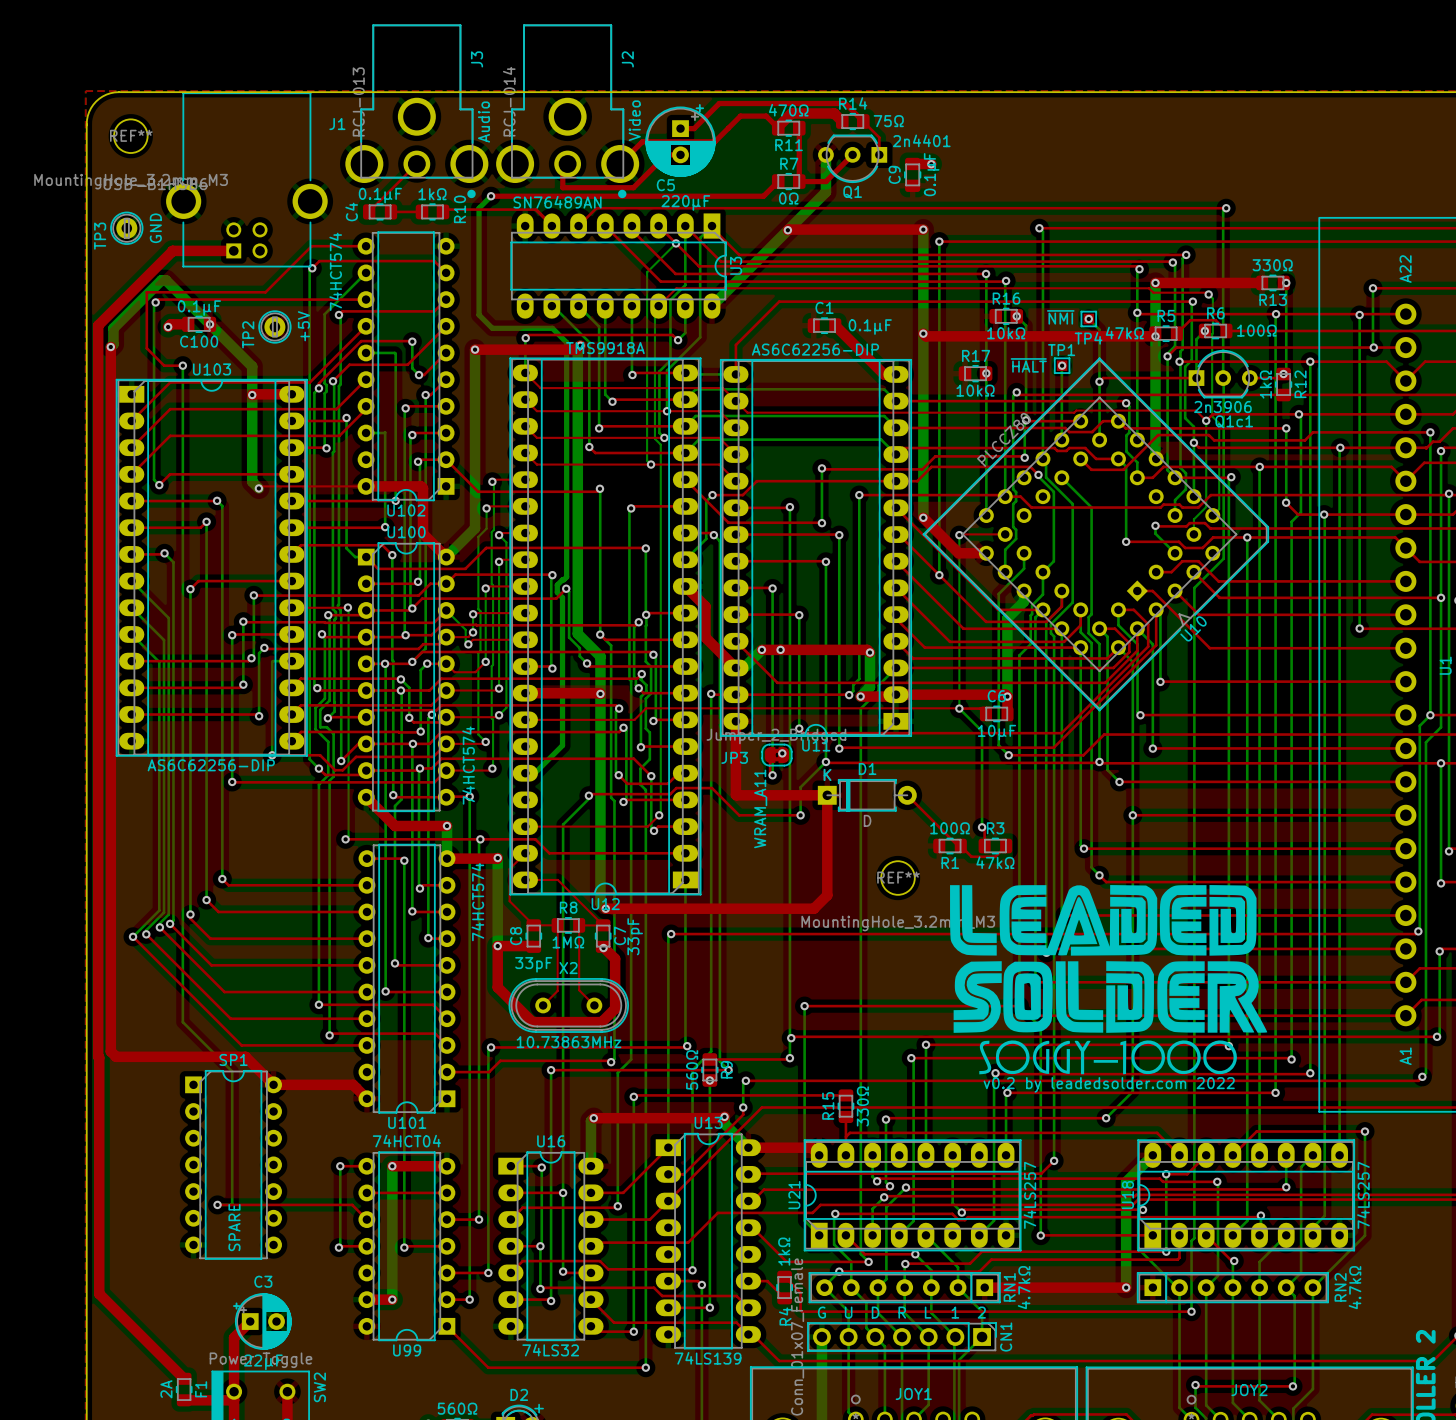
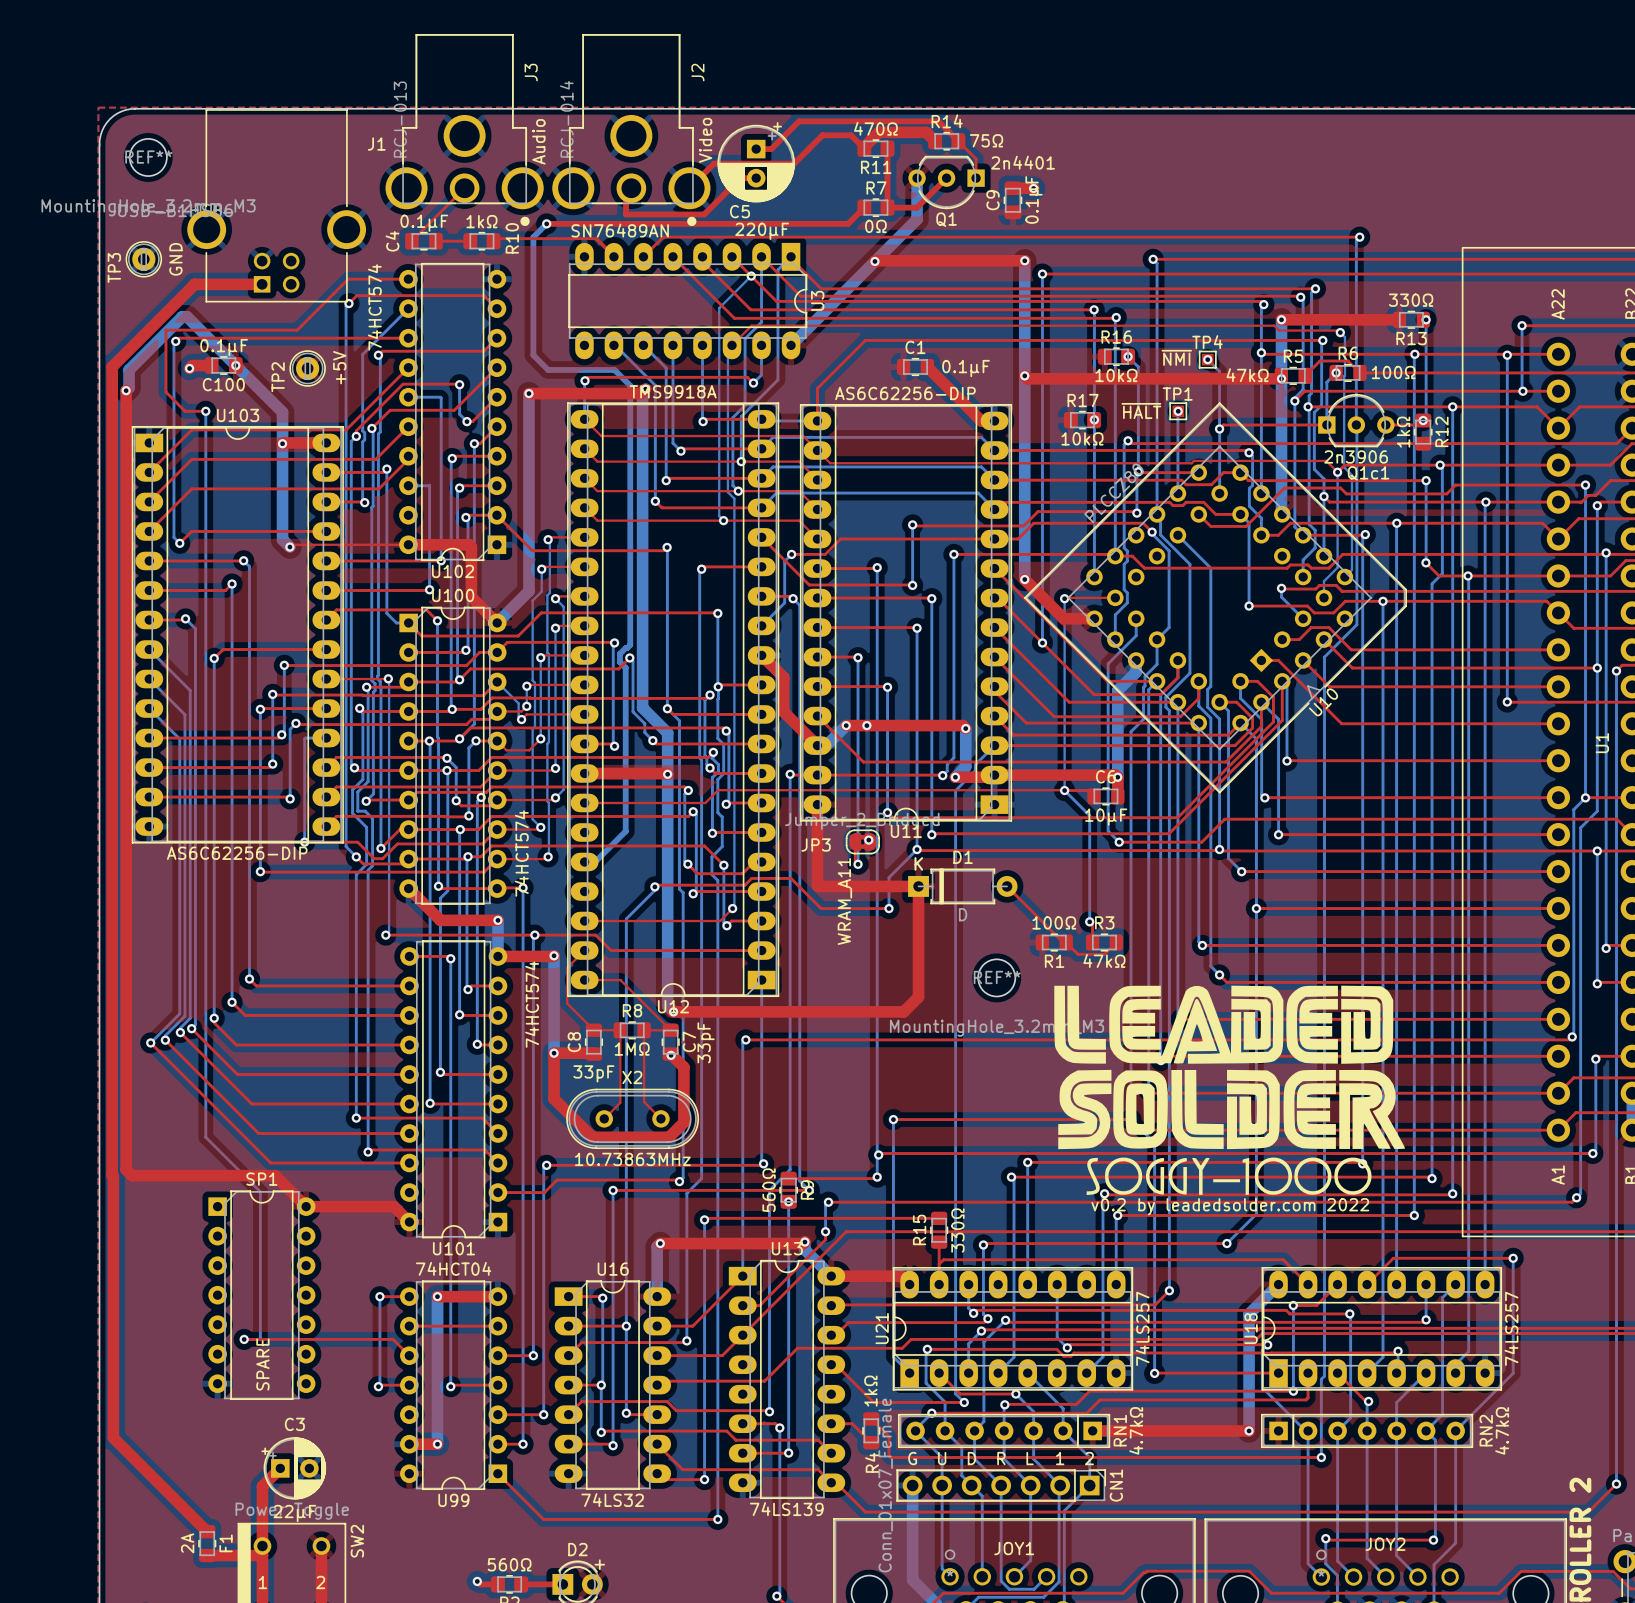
TP4 name position: TP4 (1088, 338) -> TP4 (1207, 342)

